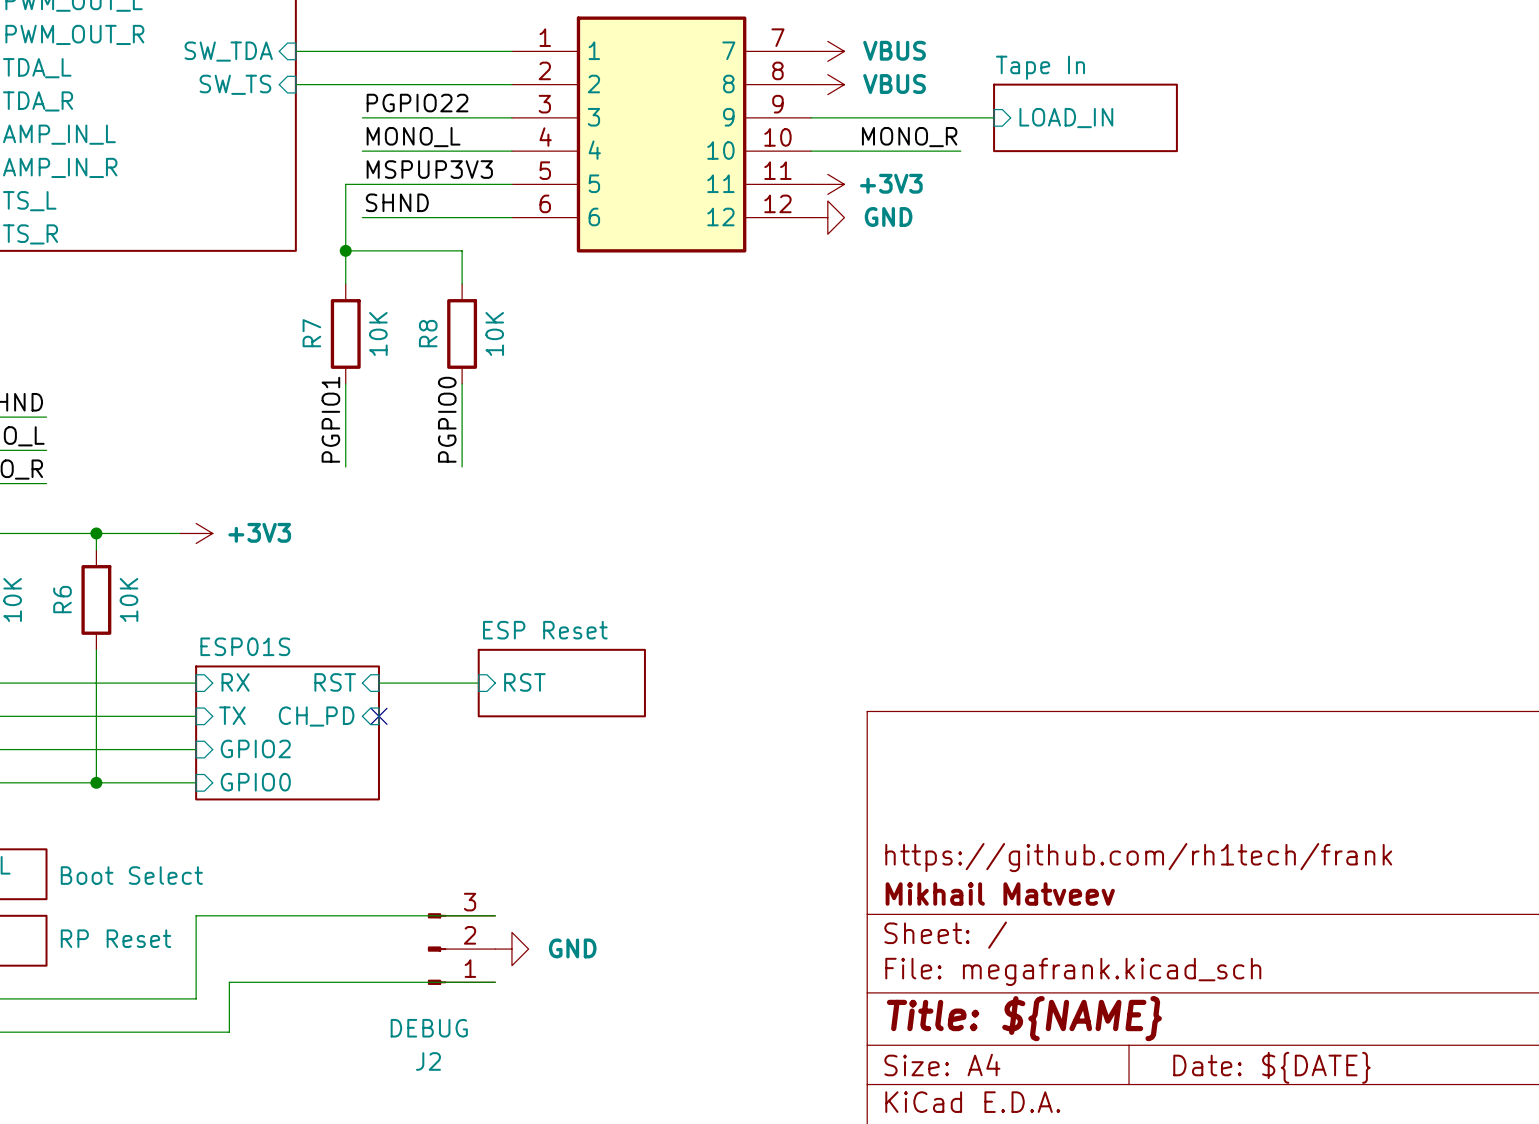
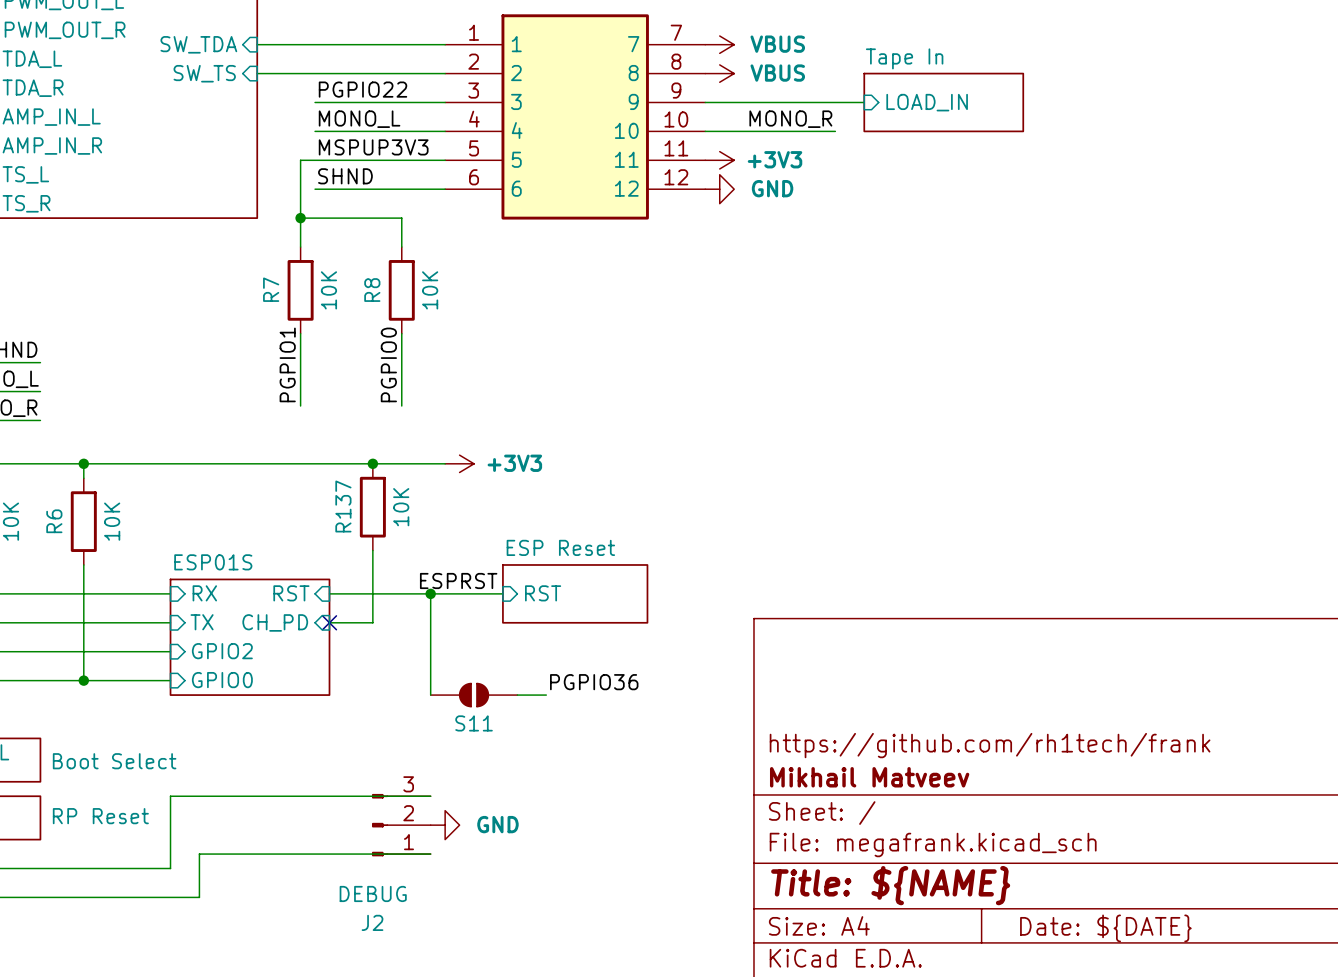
wire: none -> (156, 463) (445, 463)
power symbol: +3V3 (196, 533) -> none
junction: none -> (372, 463)
power symbol: none -> +3V3 (459, 463)
R137: none -> 10K (372, 507)
wire: none -> (372, 550) (372, 622) (329, 622)
label: none -> ESPRST (458, 580)
sheet pin position: RST (524, 682) -> RST (543, 593)
wire: none -> (416, 593) (502, 593)
wire: none -> (430, 593) (430, 695)
junction: none -> (430, 593)
sheet ESP Reset position: (561, 683) -> (575, 593)
label: none -> PGPIO36 (594, 682)
S11: none -> (474, 695)
wire: none -> (517, 695) (546, 695)

